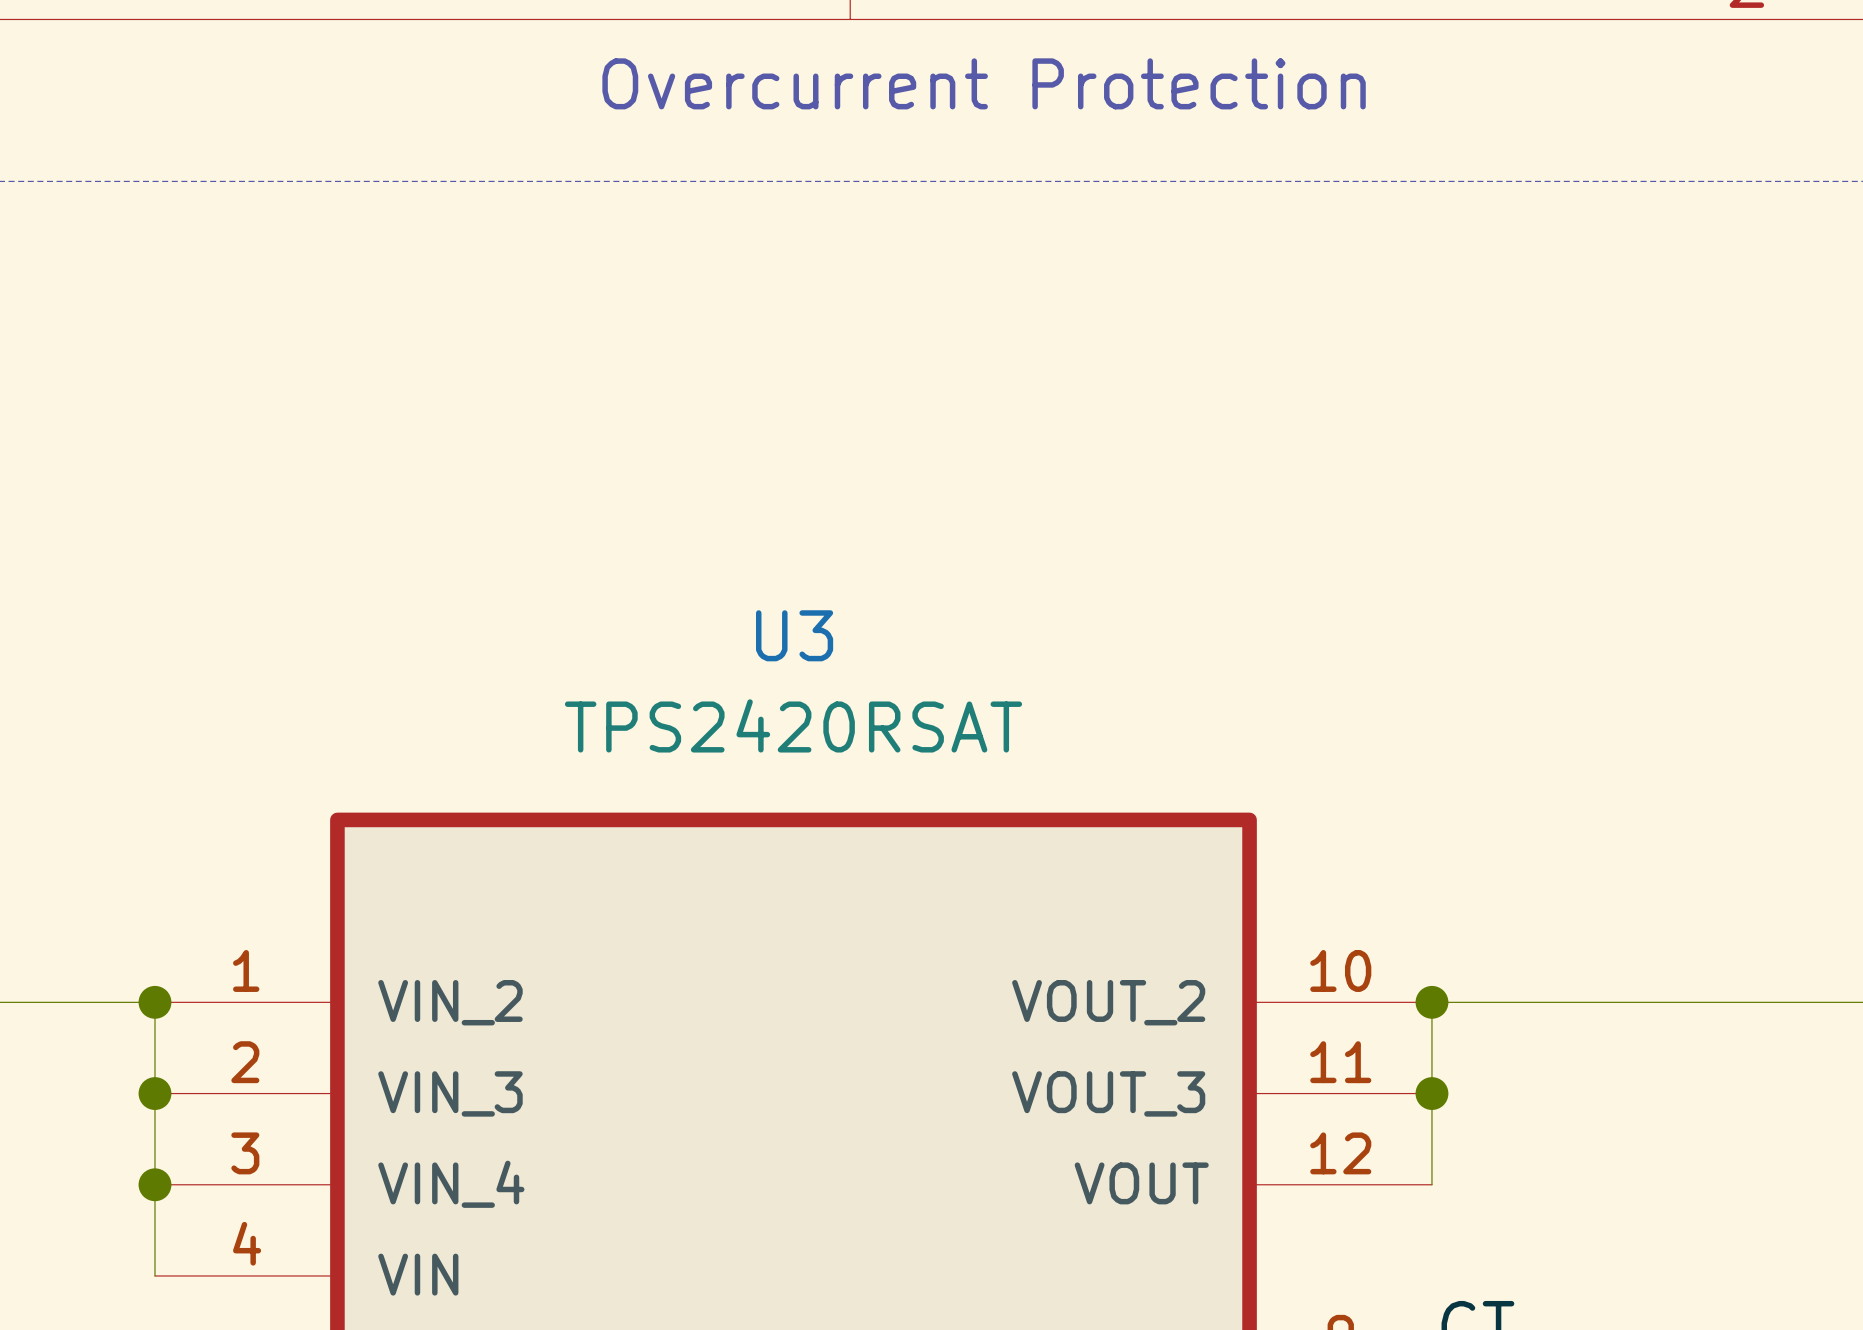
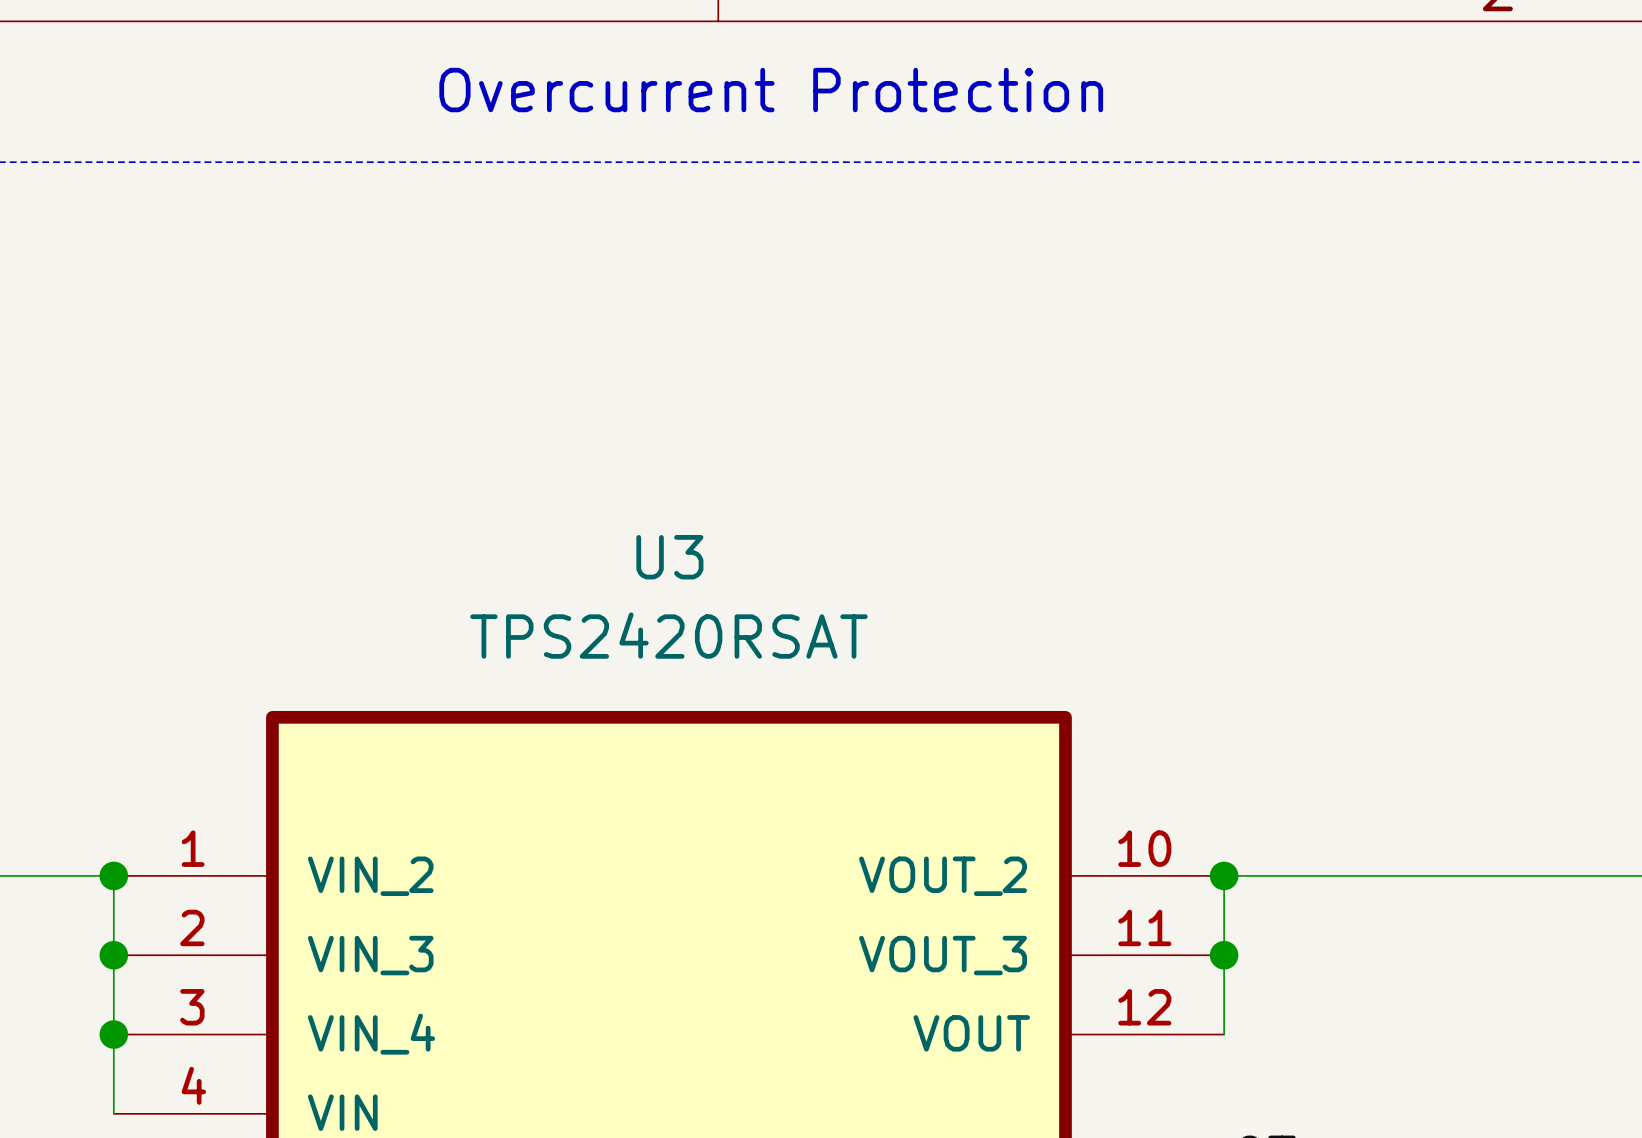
text position: Overcurrent Protection (984, 83) -> Overcurrent Protection (771, 90)

